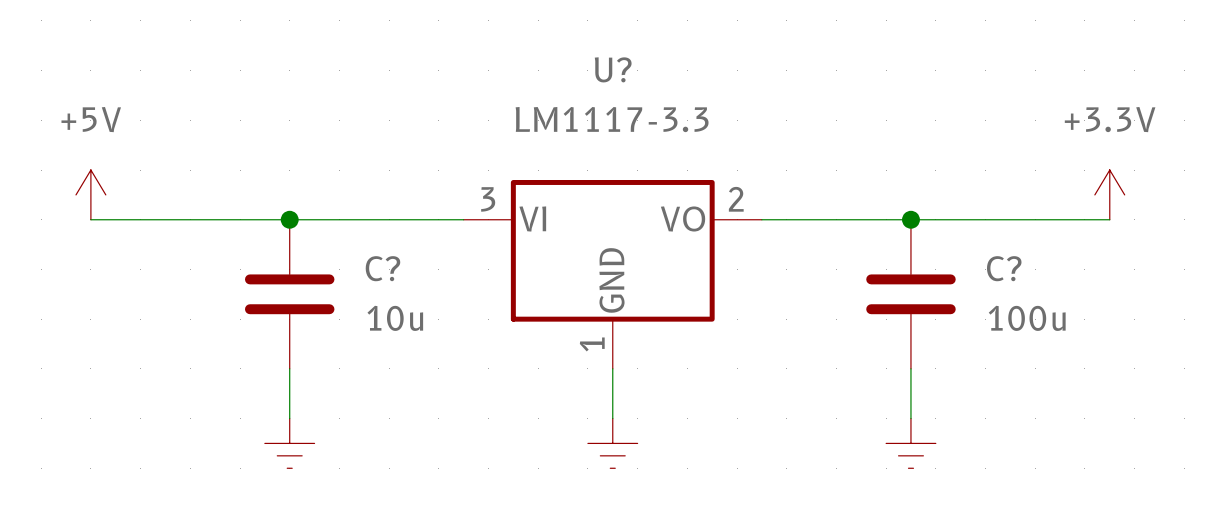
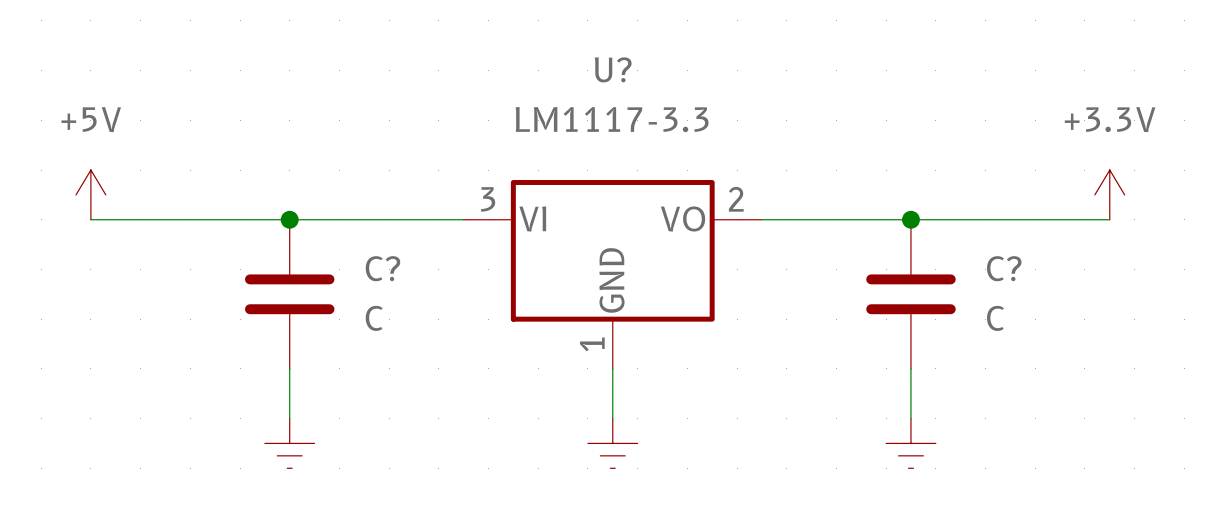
C? value: 10u (395, 318) -> C (374, 318)
C? value: 100u (1027, 318) -> C (995, 318)

